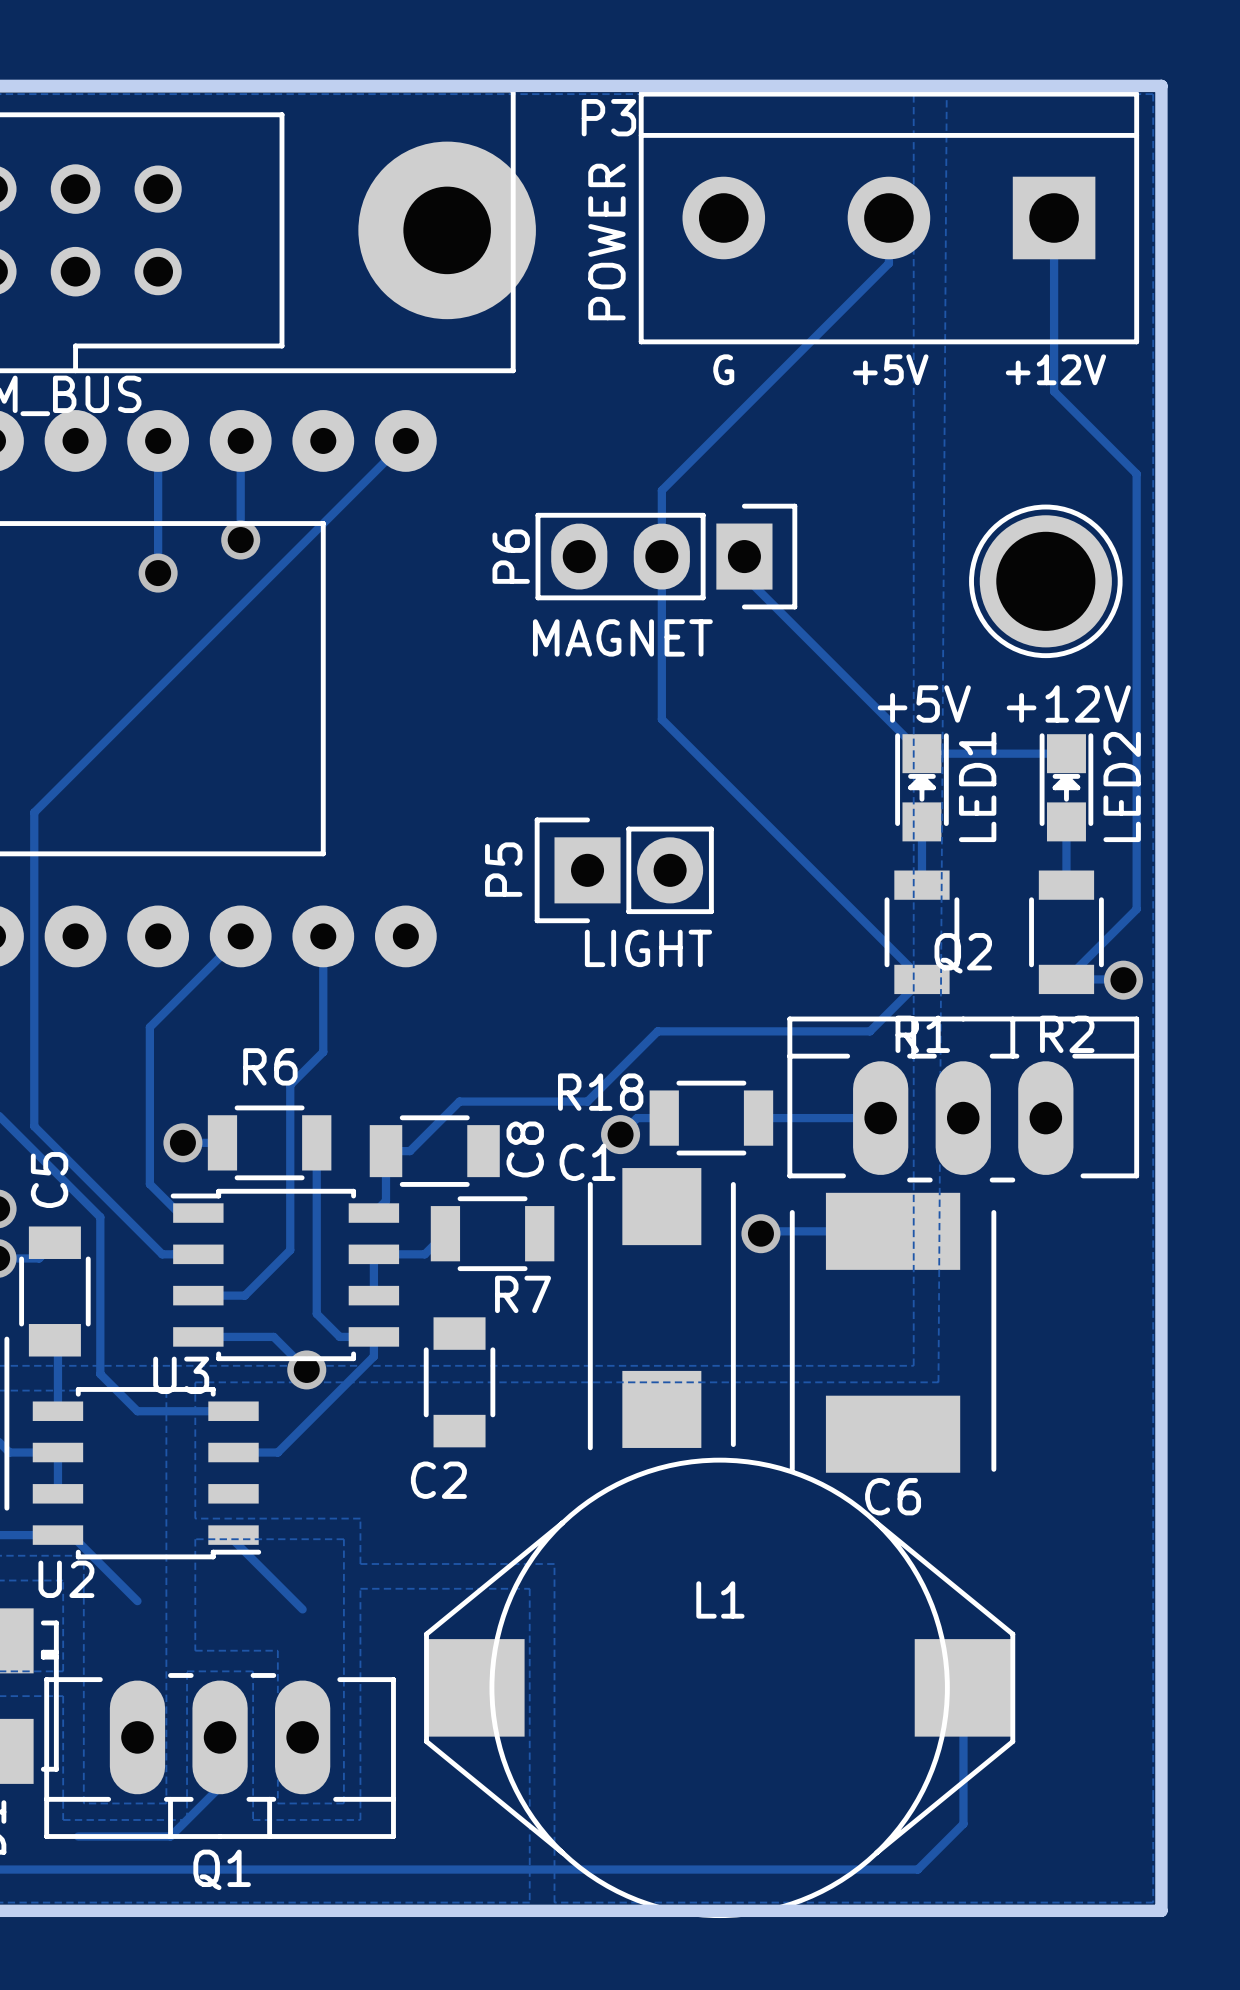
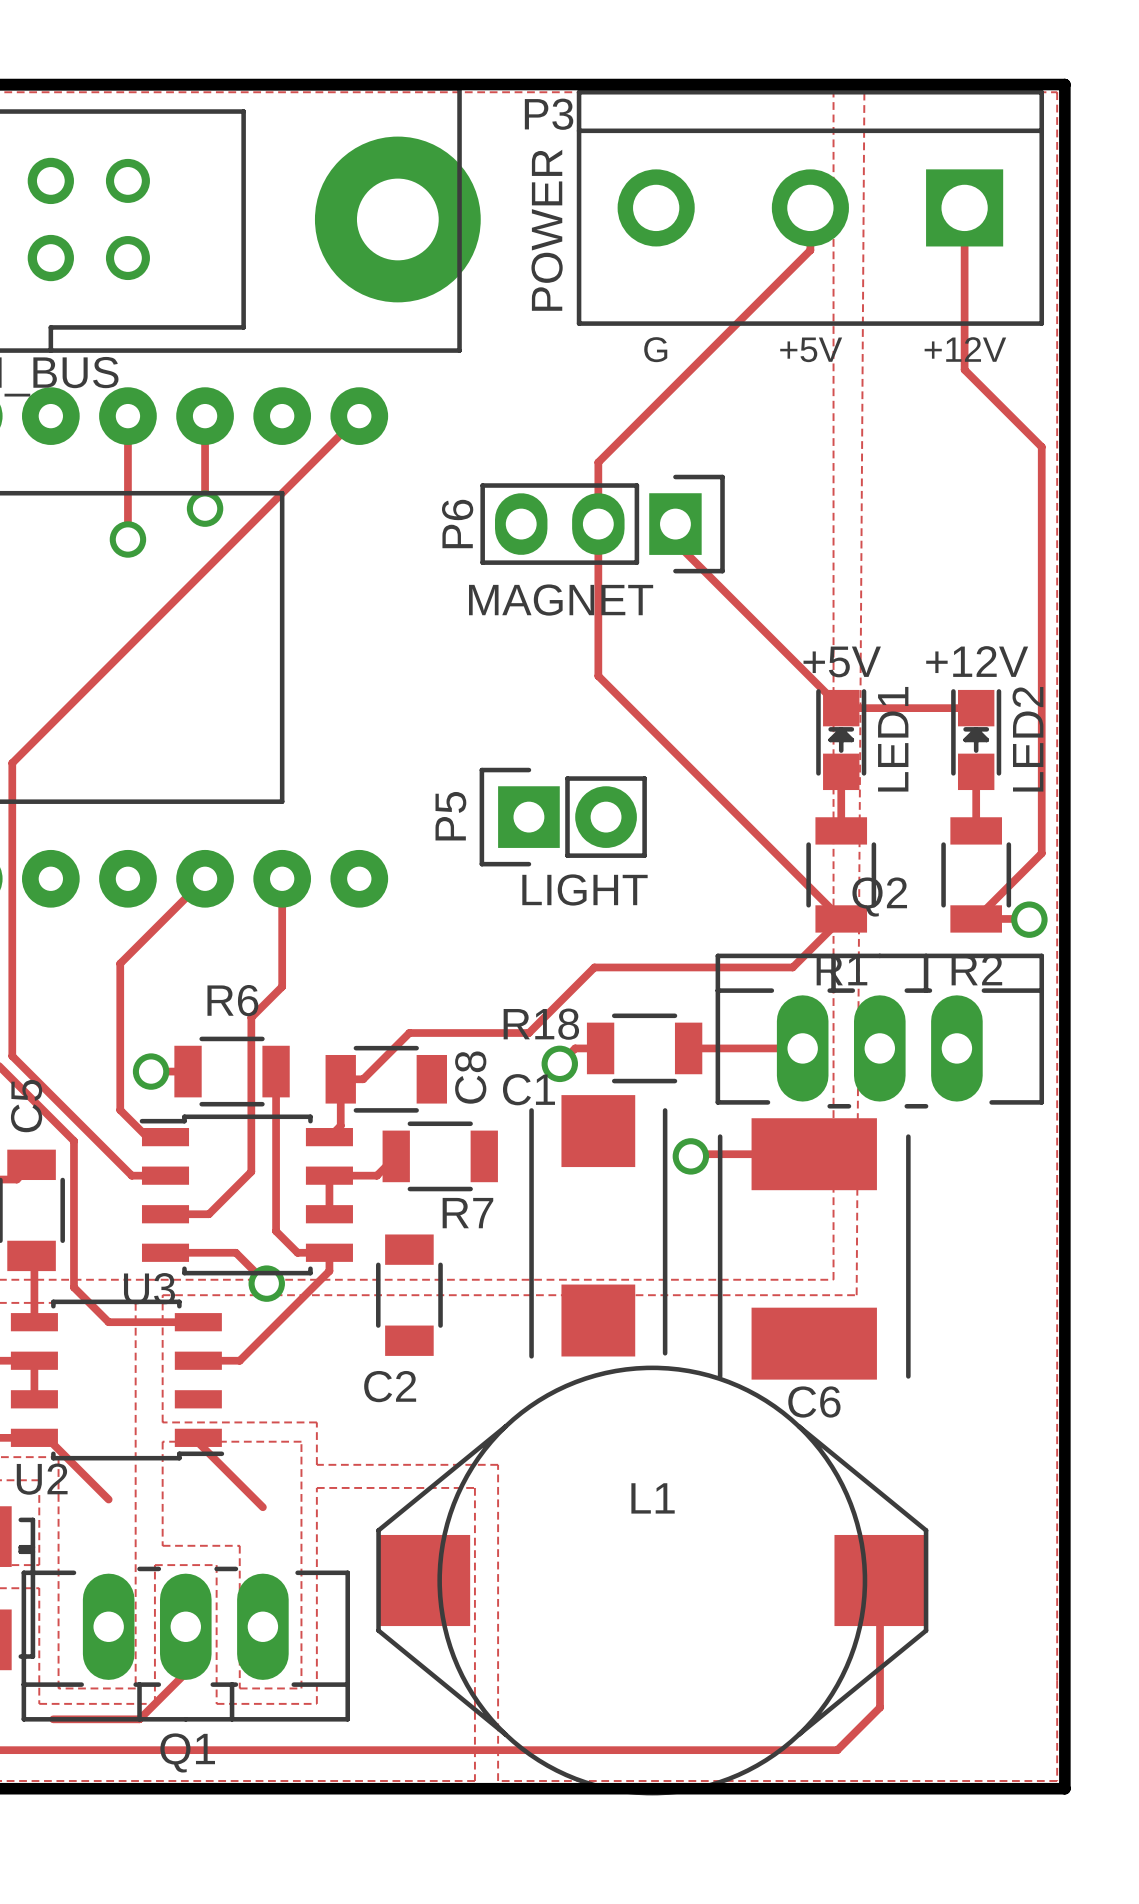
part: (1045, 581) -> none

